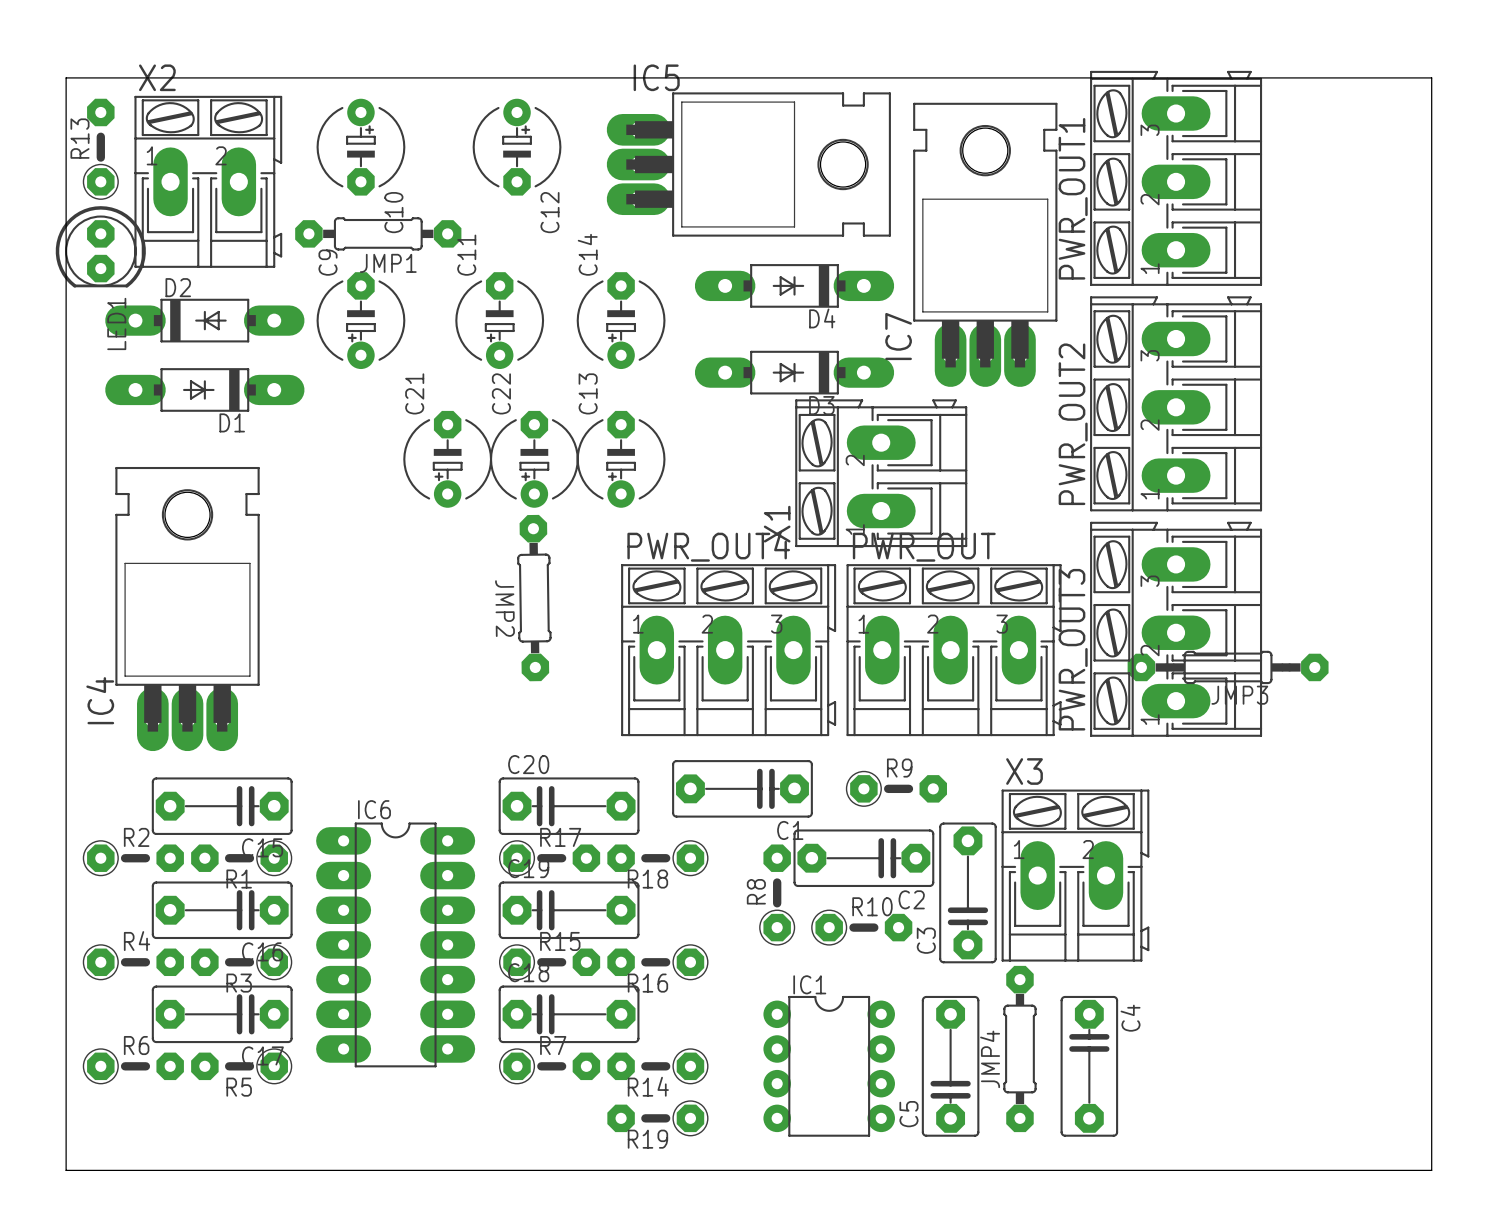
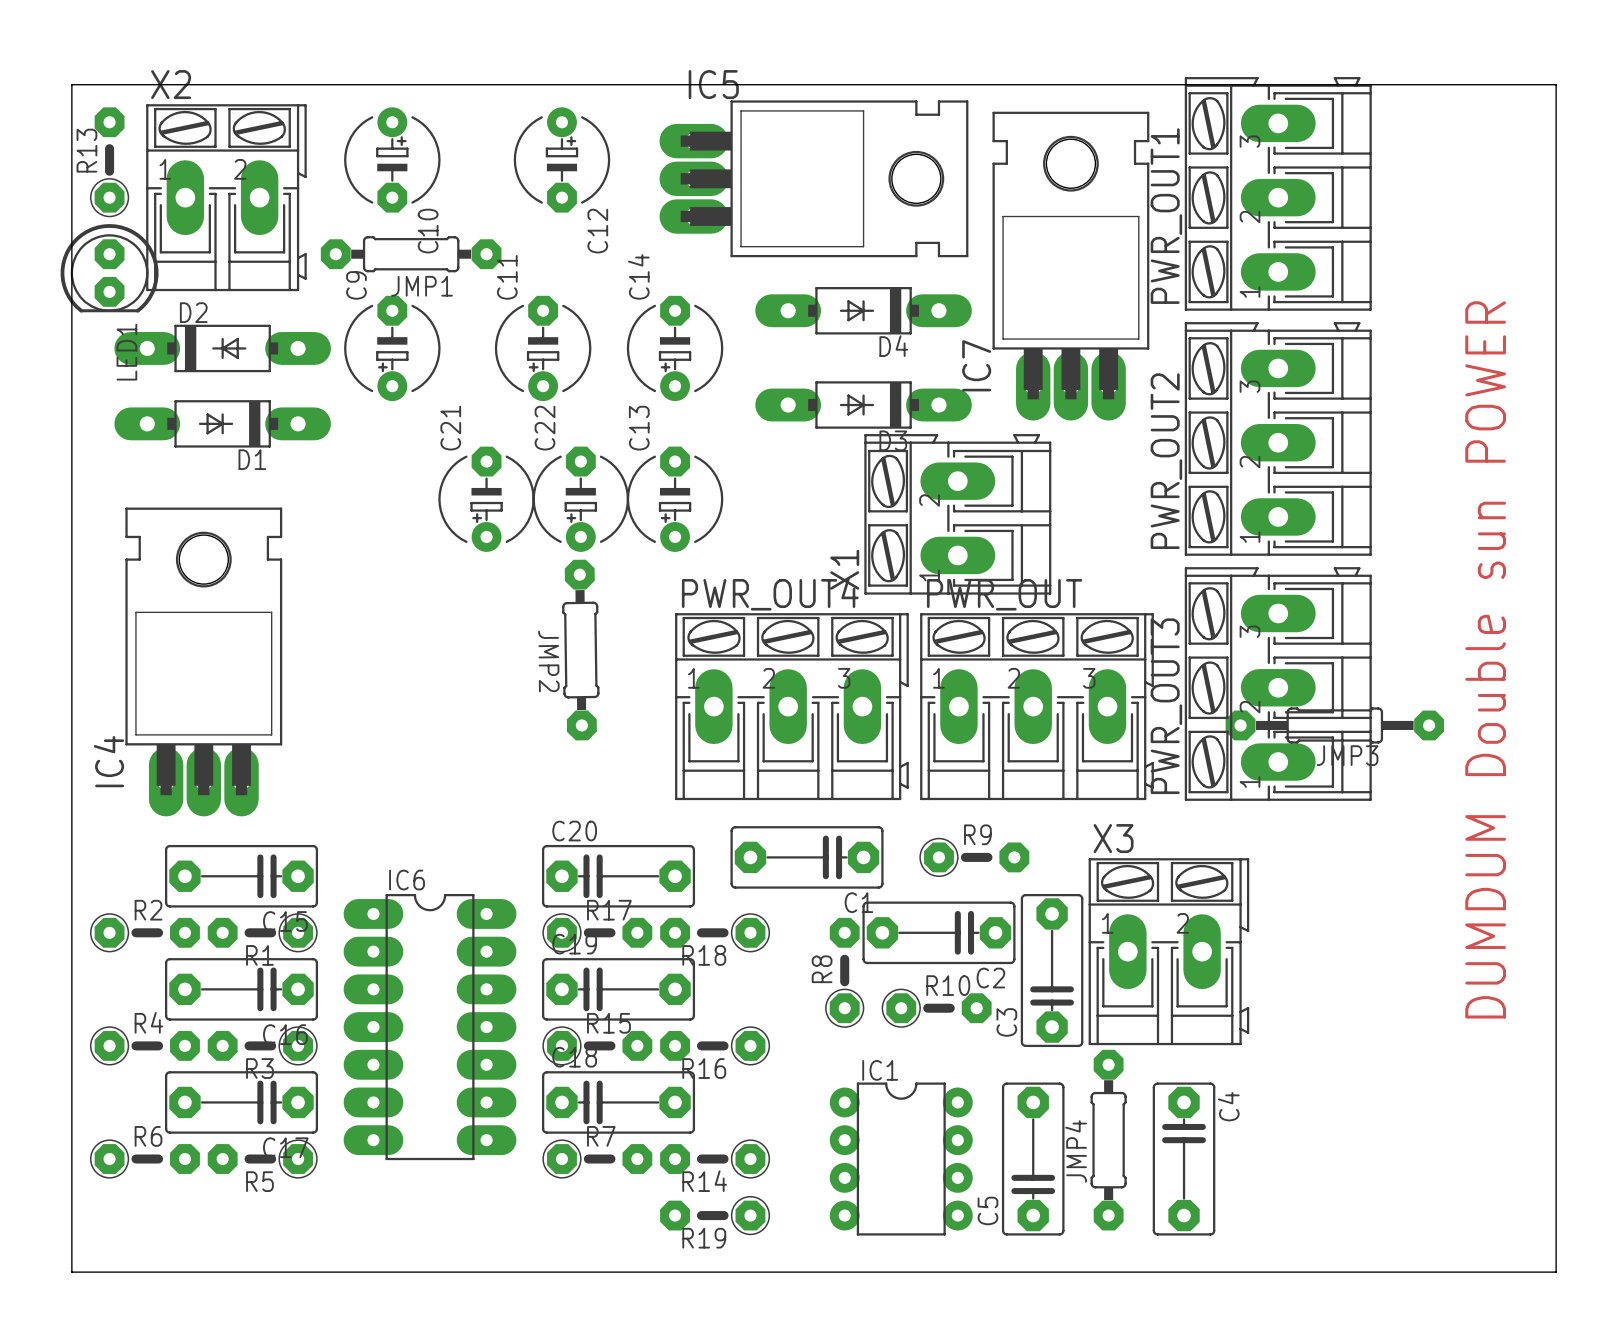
text: none -> DUMDUM Double sun POWER (1485, 659)

